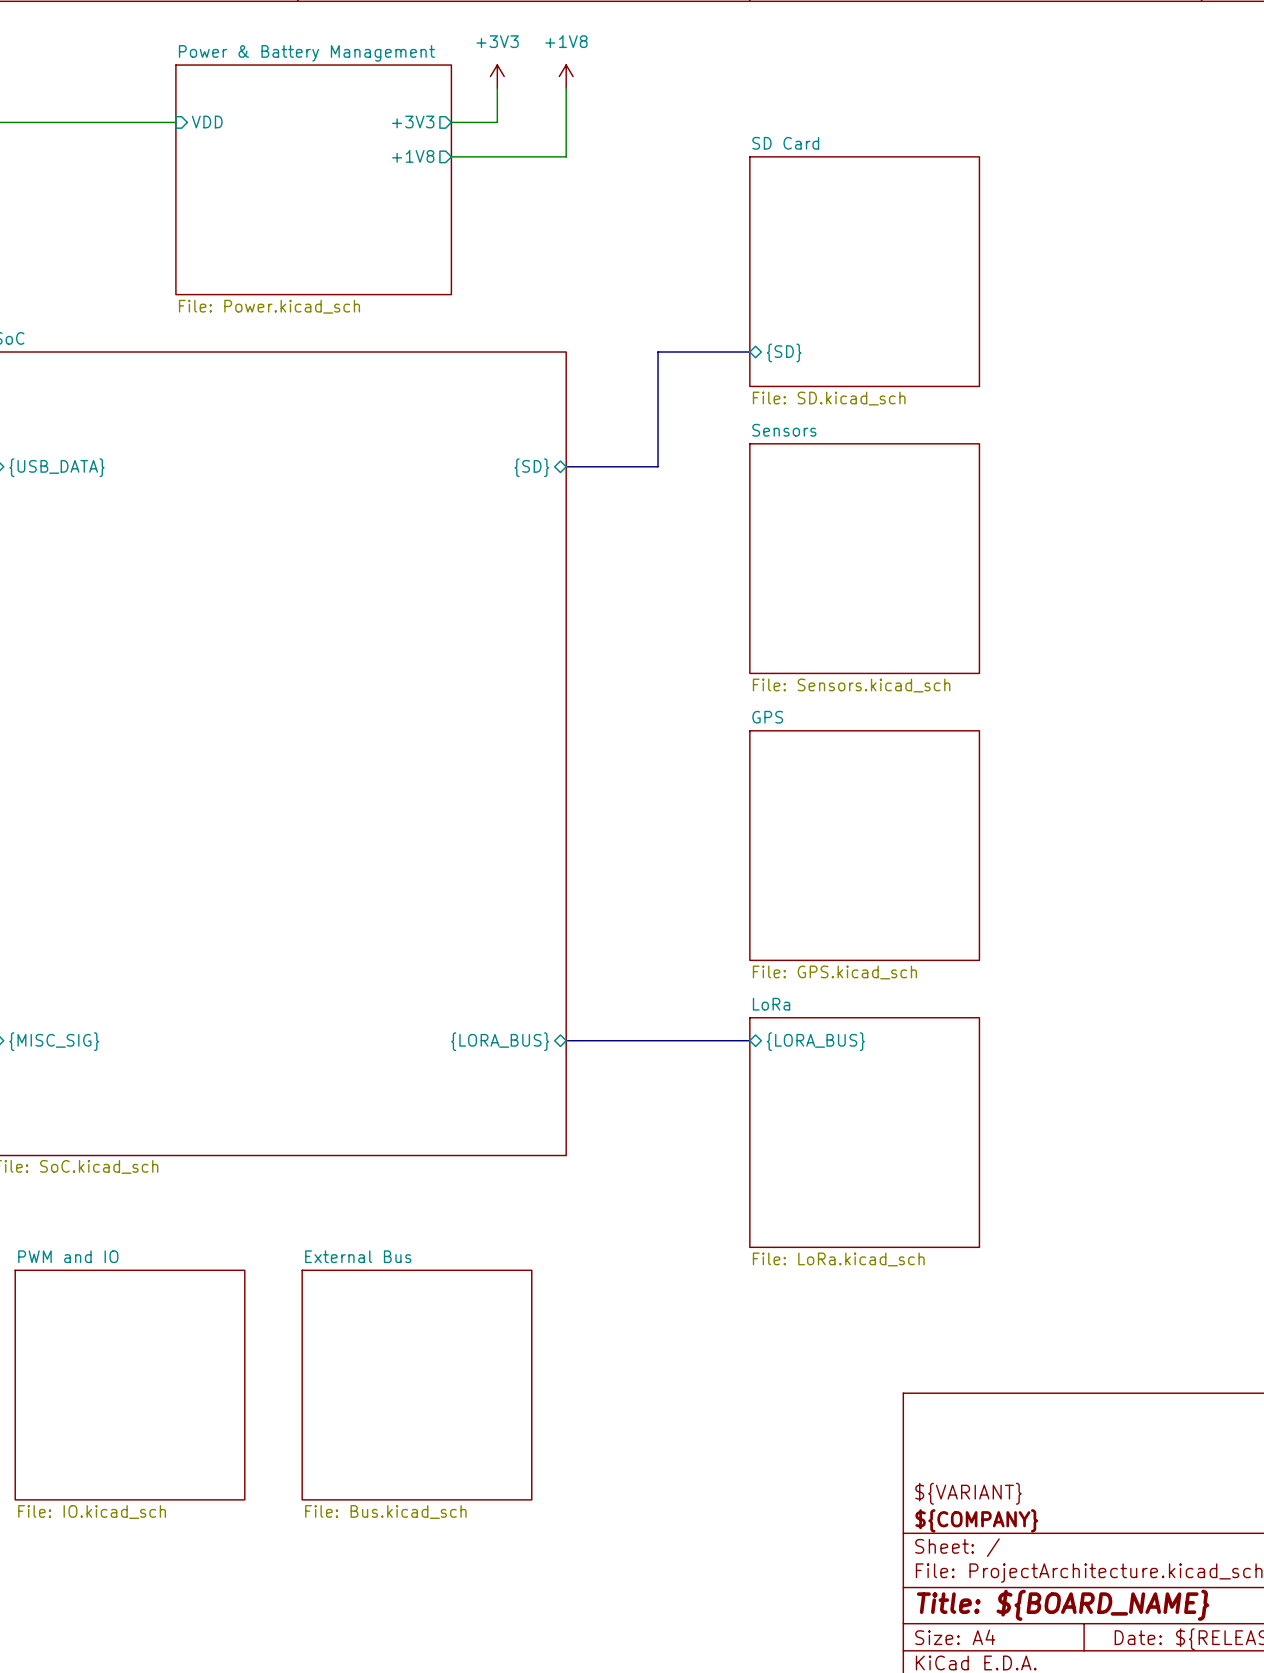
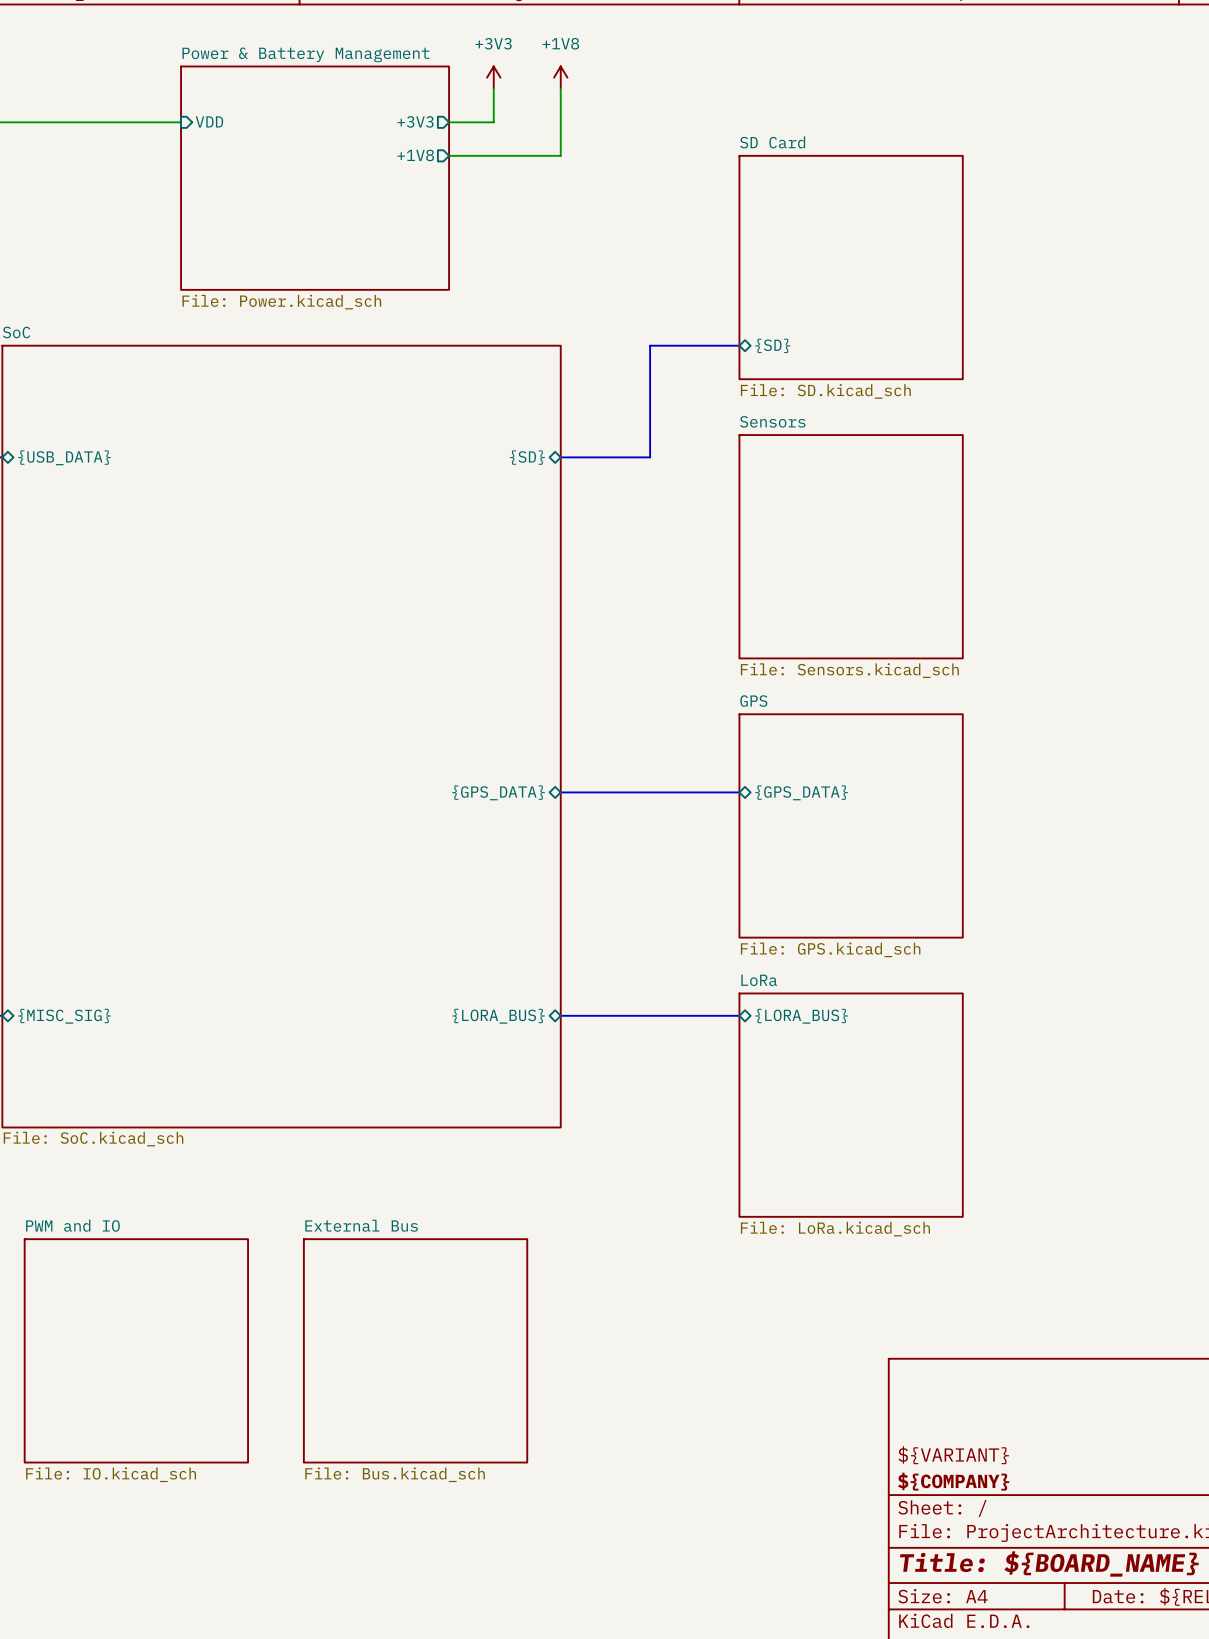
bus: none -> (560, 792) (739, 792)
sheet pin: none -> {GPS_DATA} (498, 792)
sheet pin: none -> {GPS_DATA} (801, 792)

